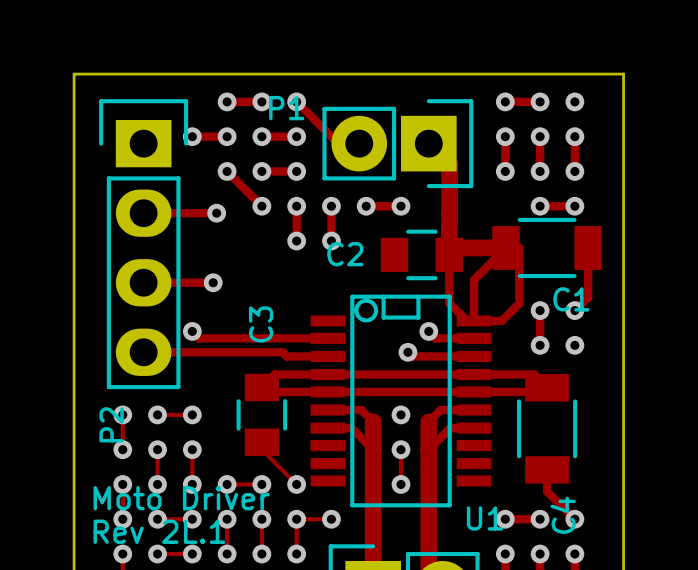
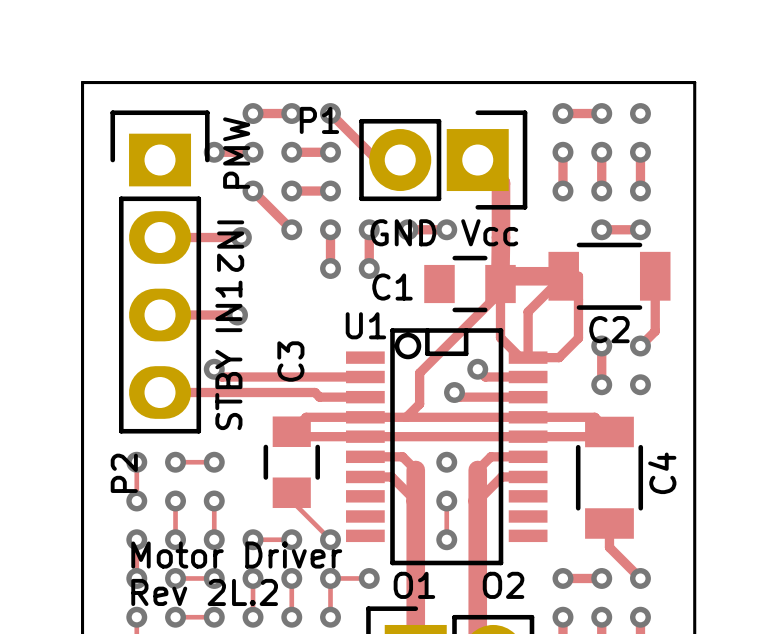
text: none -> PMW (236, 153)
text: none -> GND (403, 232)
text: none -> Vcc (489, 232)
text: none -> IN2 (230, 246)
C2 name position: C2 (345, 254) -> C2 (609, 329)
track: none -> (500, 292) (419, 373) (419, 404) (406, 417)
text: none -> IN1 (228, 306)
C1 name position: C1 (571, 299) -> C1 (392, 287)
text: none -> STBY (228, 389)
text: Moto Driver (181, 498) -> Motor Driver (236, 555)
C4 name position: C4 (563, 515) -> C4 (662, 473)
U1 name position: U1 (484, 518) -> U1 (365, 325)
text: none -> O1 (414, 585)
text: none -> O2 (503, 585)
text: Rev 2L.1 (159, 531) -> Rev 2L.2 (204, 592)

